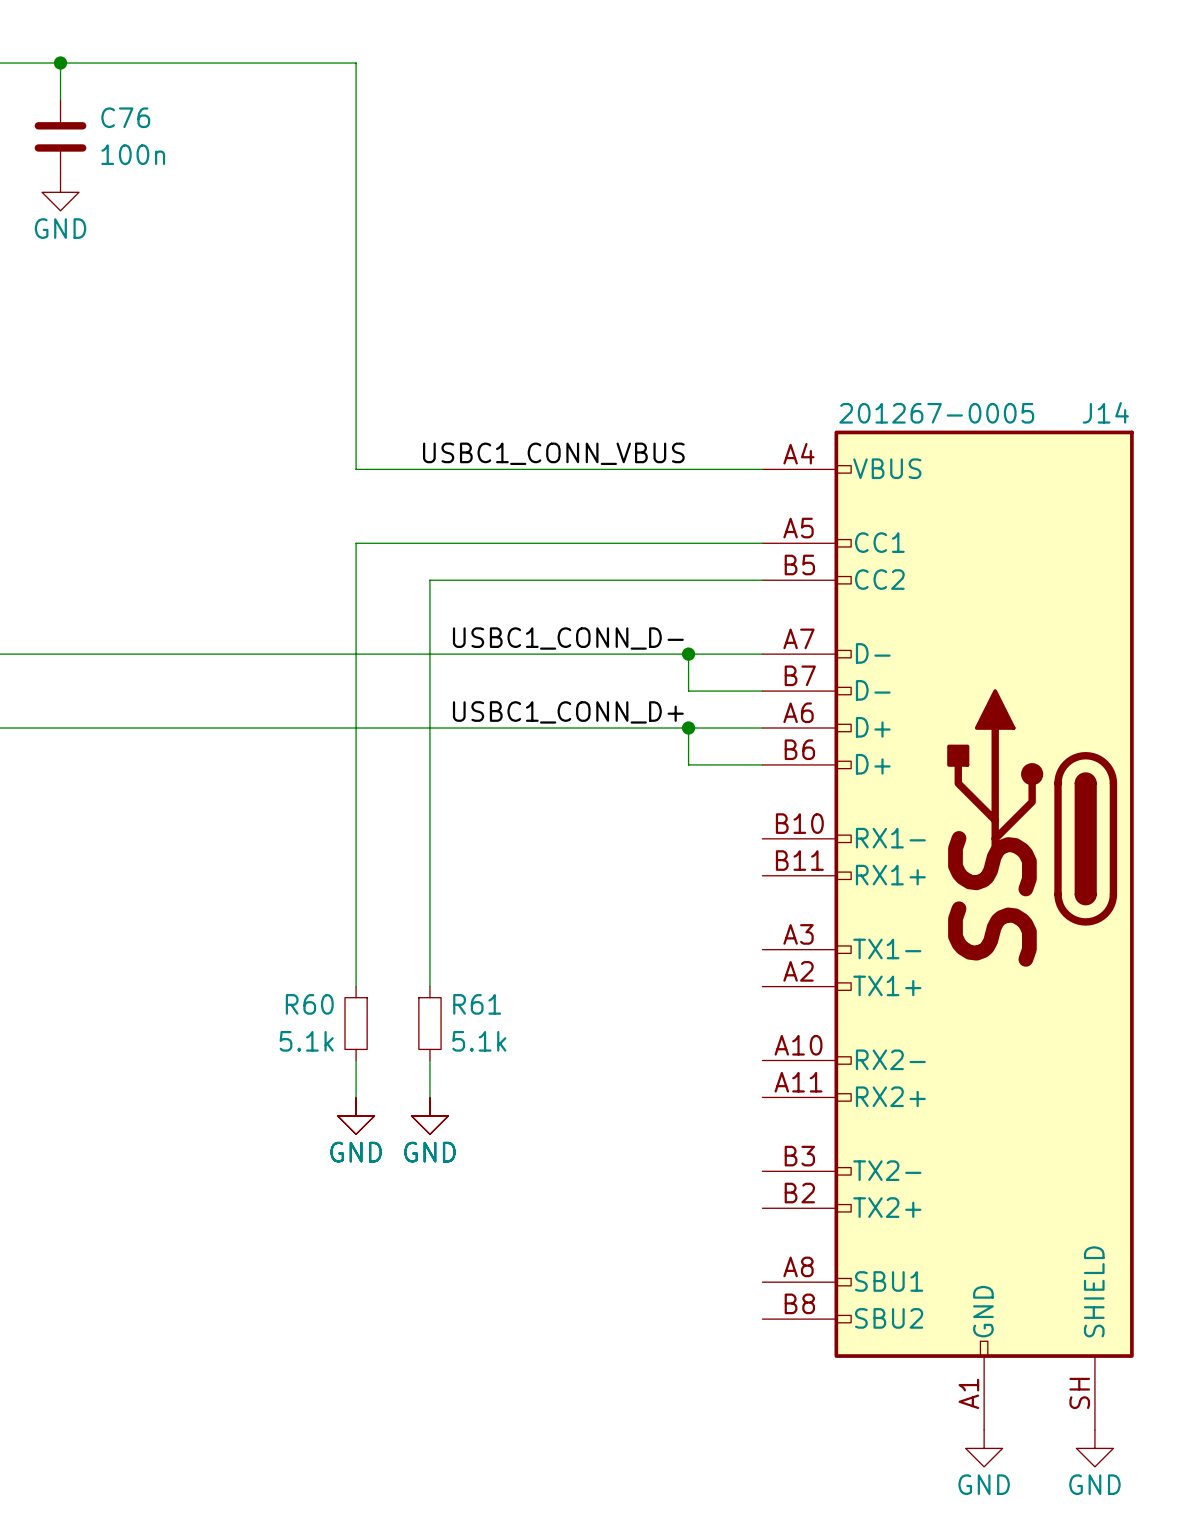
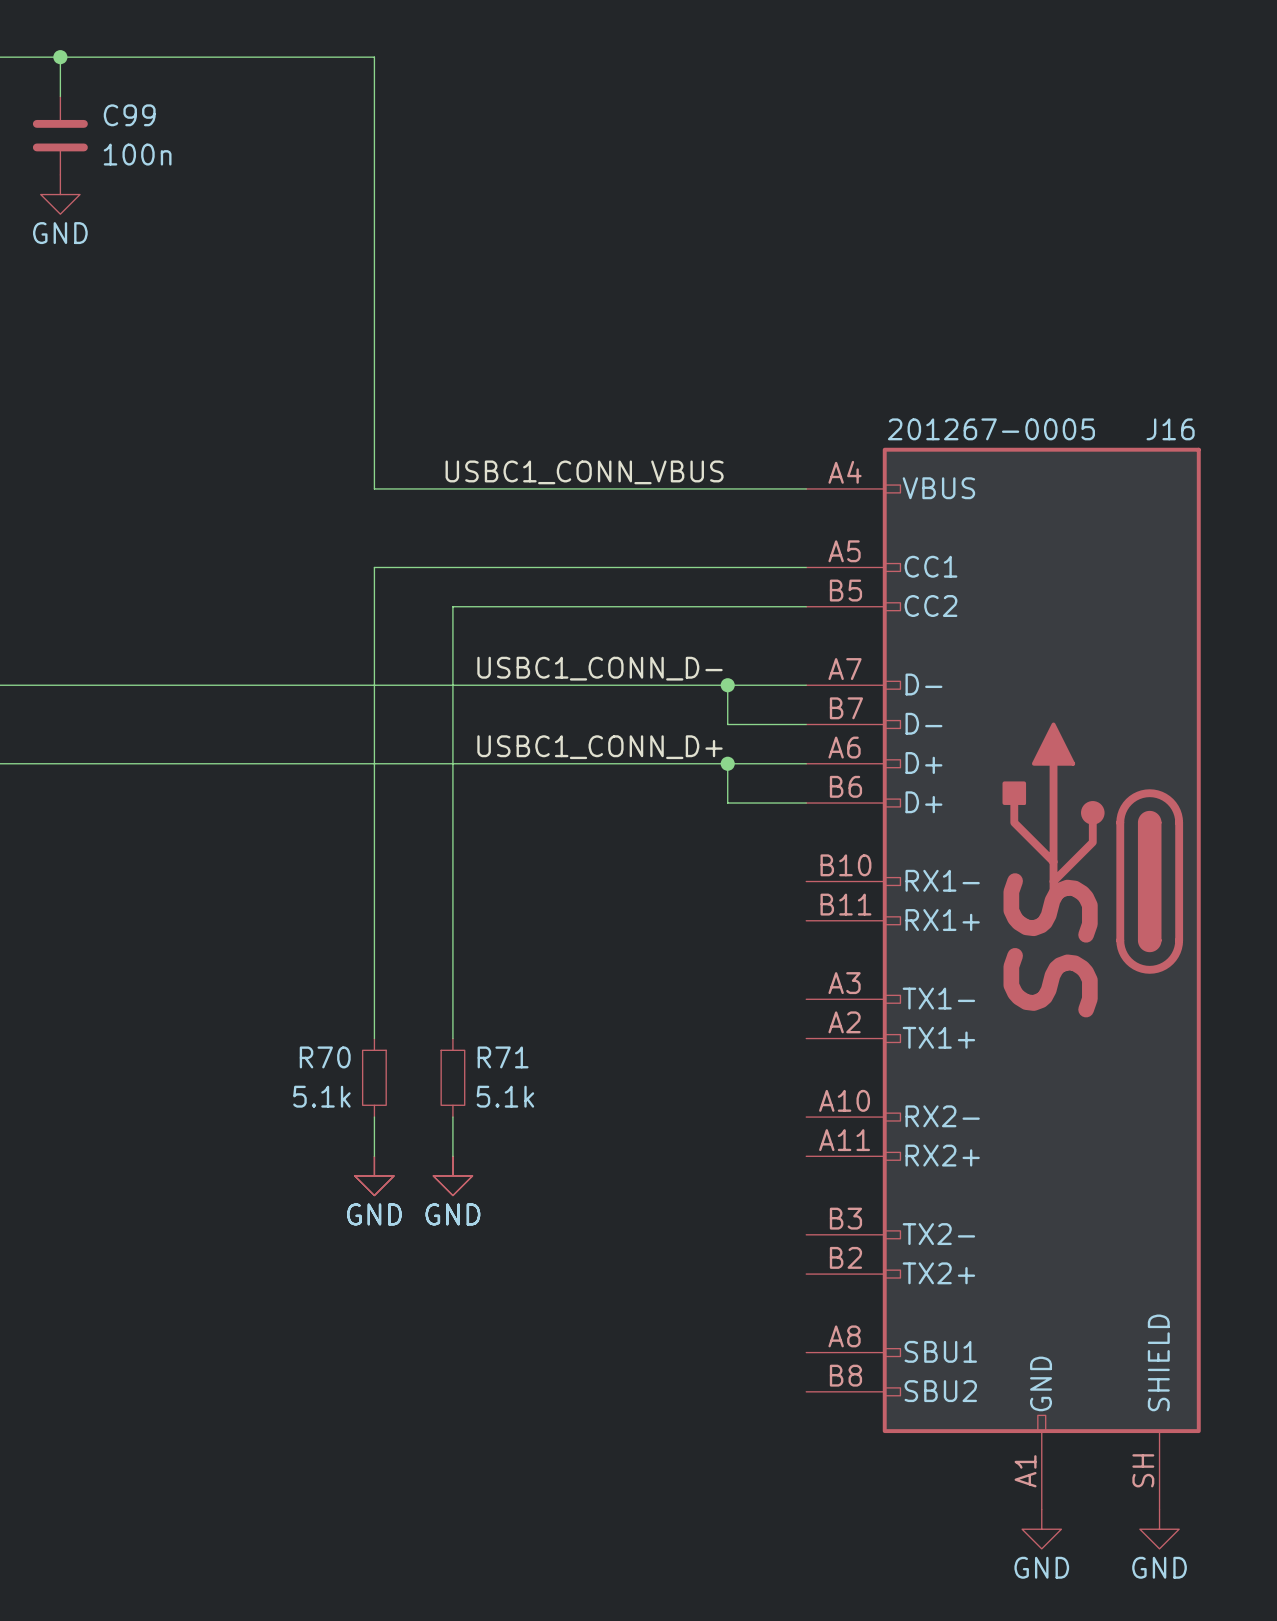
C76 name: C76 (125, 117) -> C99 (129, 115)
J14 name: J14 (1105, 412) -> J16 (1170, 429)
R60 name: R60 (309, 1004) -> R70 (325, 1057)
R61 name: R61 (477, 1004) -> R71 (503, 1057)

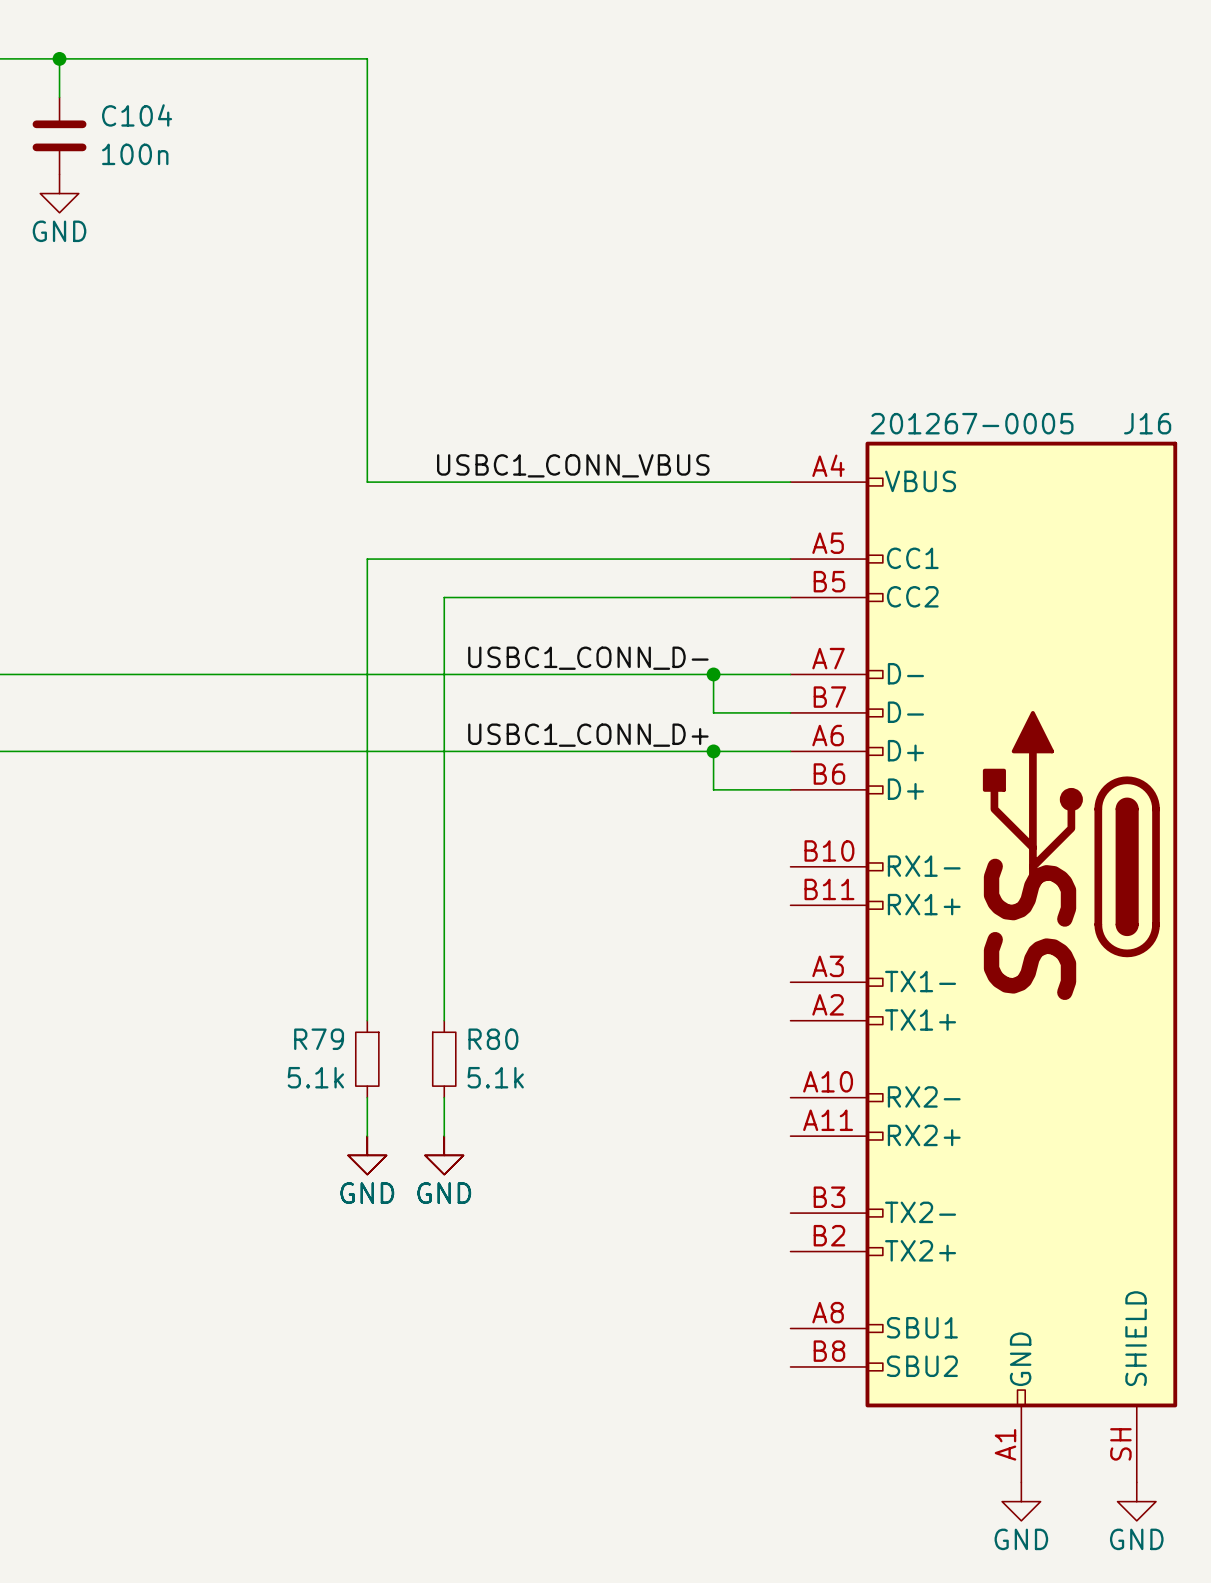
C99 name: C99 (129, 115) -> C104 (137, 115)
R70 name: R70 (325, 1057) -> R79 (319, 1039)
R71 name: R71 (503, 1057) -> R80 (493, 1039)

